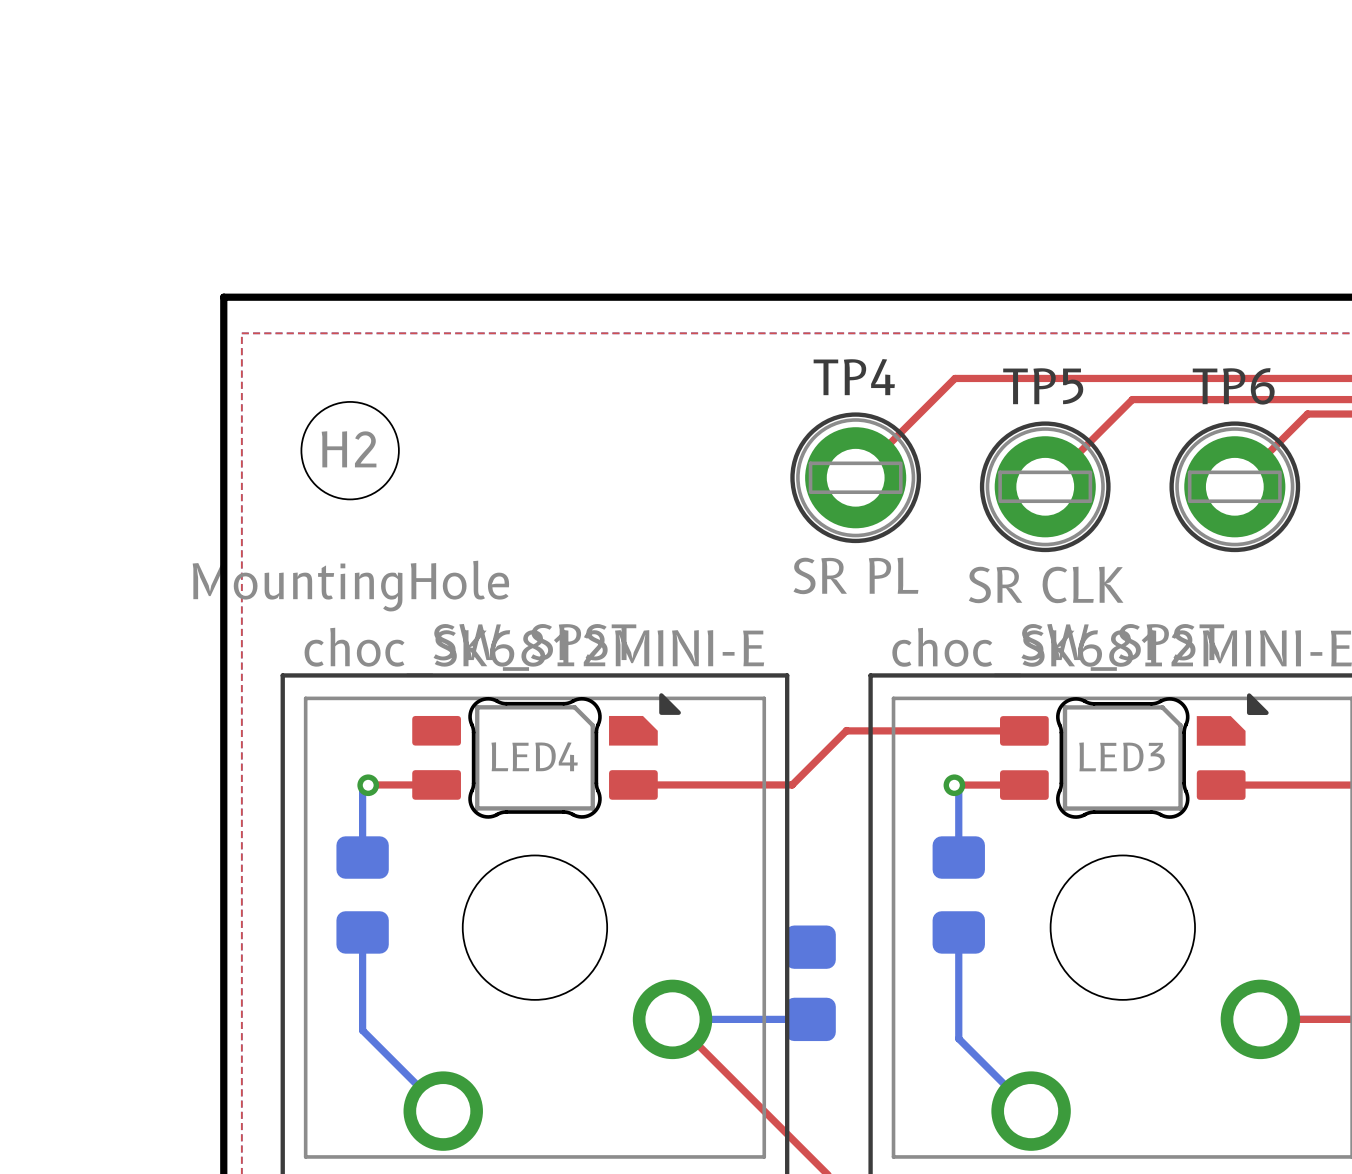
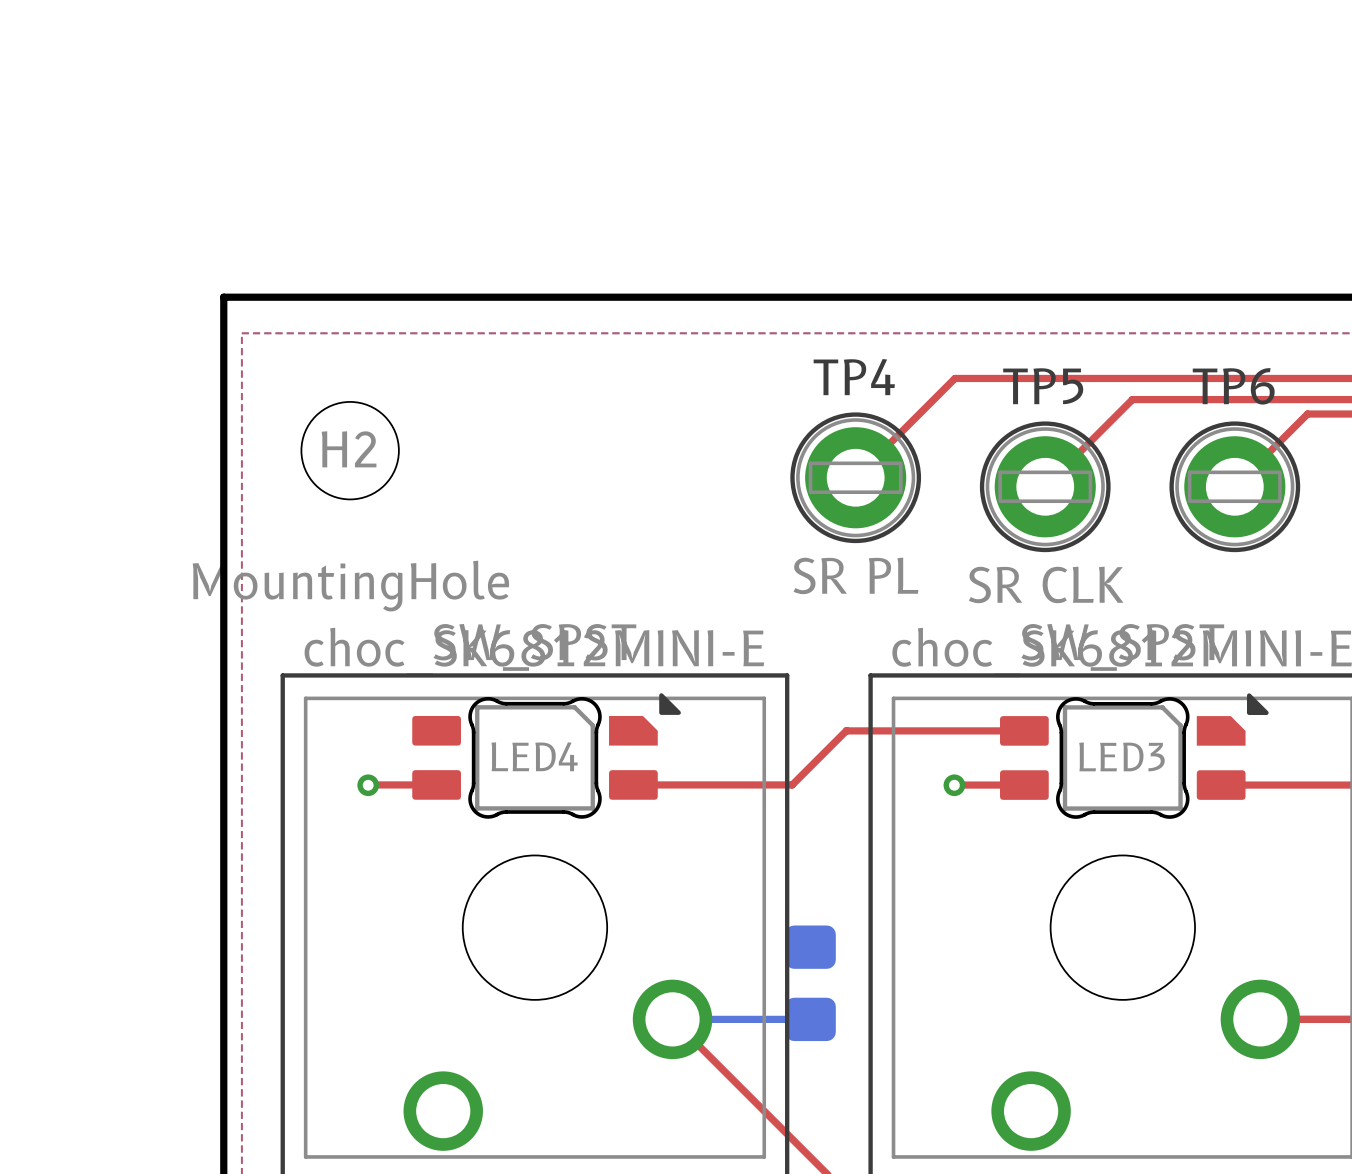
bottom track: (368, 785) (362, 790) (362, 857) -> none
bottom track: (954, 785) (958, 789) (958, 857) -> none
part: (362, 894) -> none
part: (958, 894) -> none
bottom track: (362, 932) (362, 1030) (443, 1111) -> none
bottom track: (958, 932) (958, 1038) (1031, 1111) -> none

